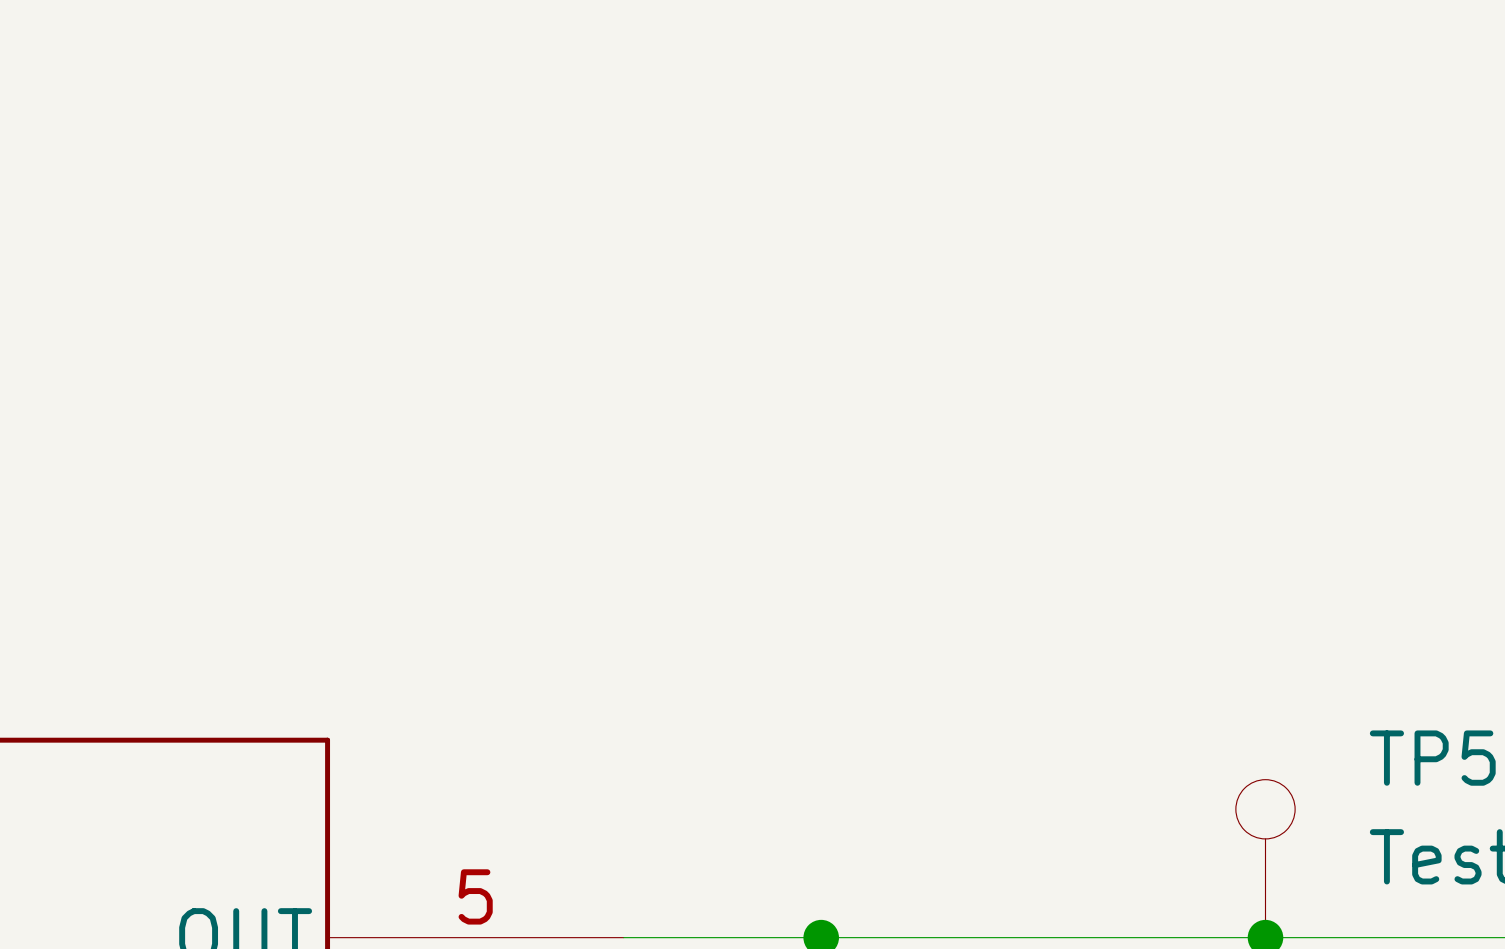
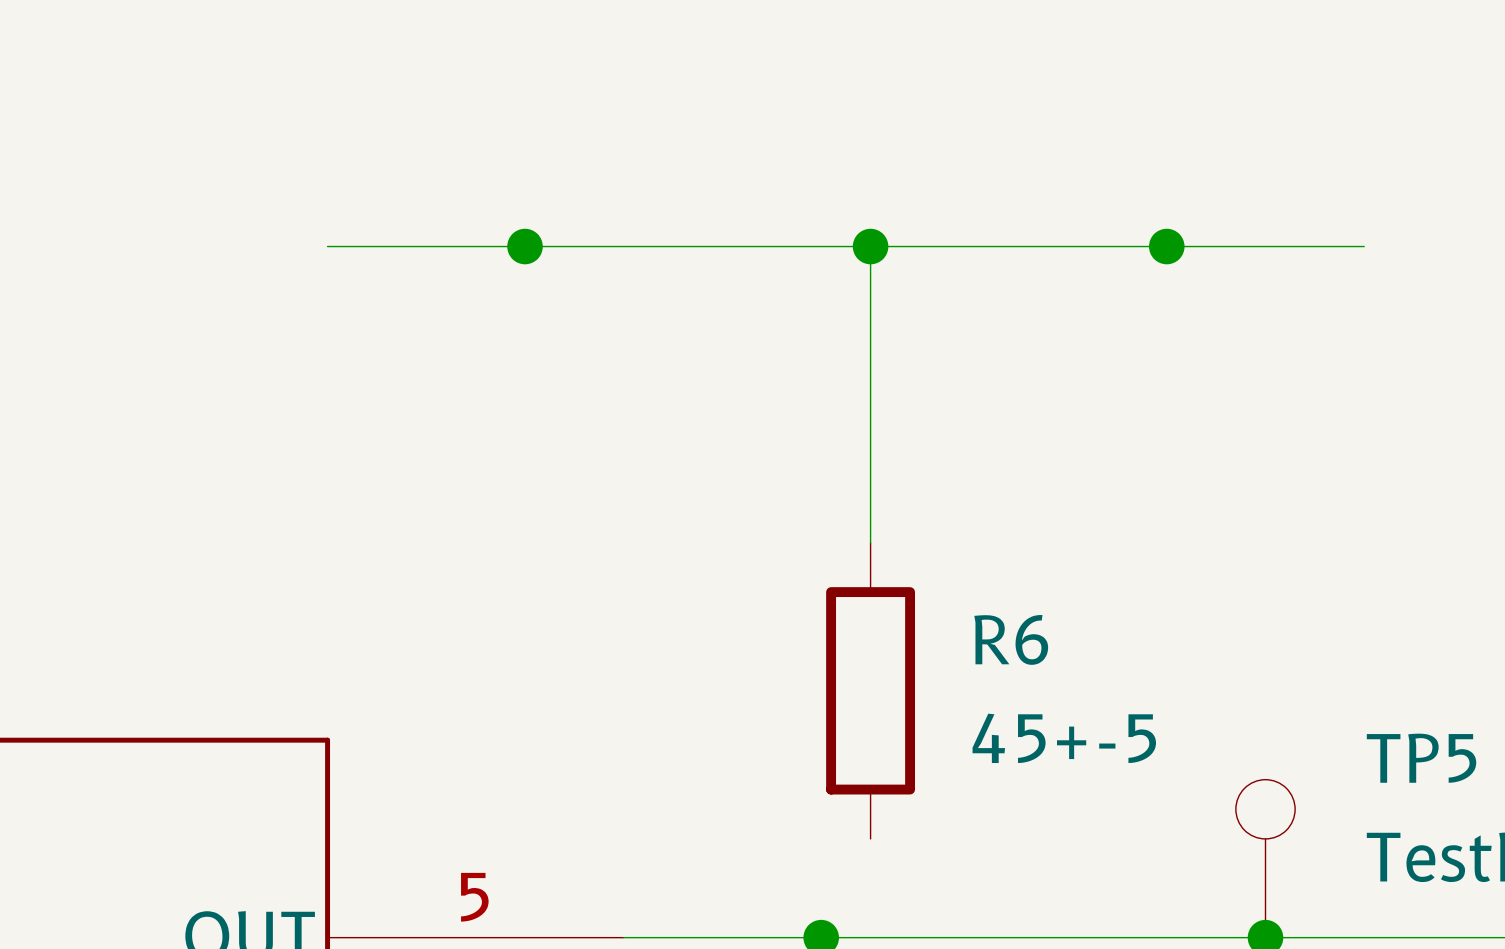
wire: none -> (327, 246) (1364, 246)
junction: none -> (525, 246)
wire: none -> (870, 246) (870, 542)
junction: none -> (870, 246)
junction: none -> (1166, 246)
R6: none -> 45+-5 (870, 690)

